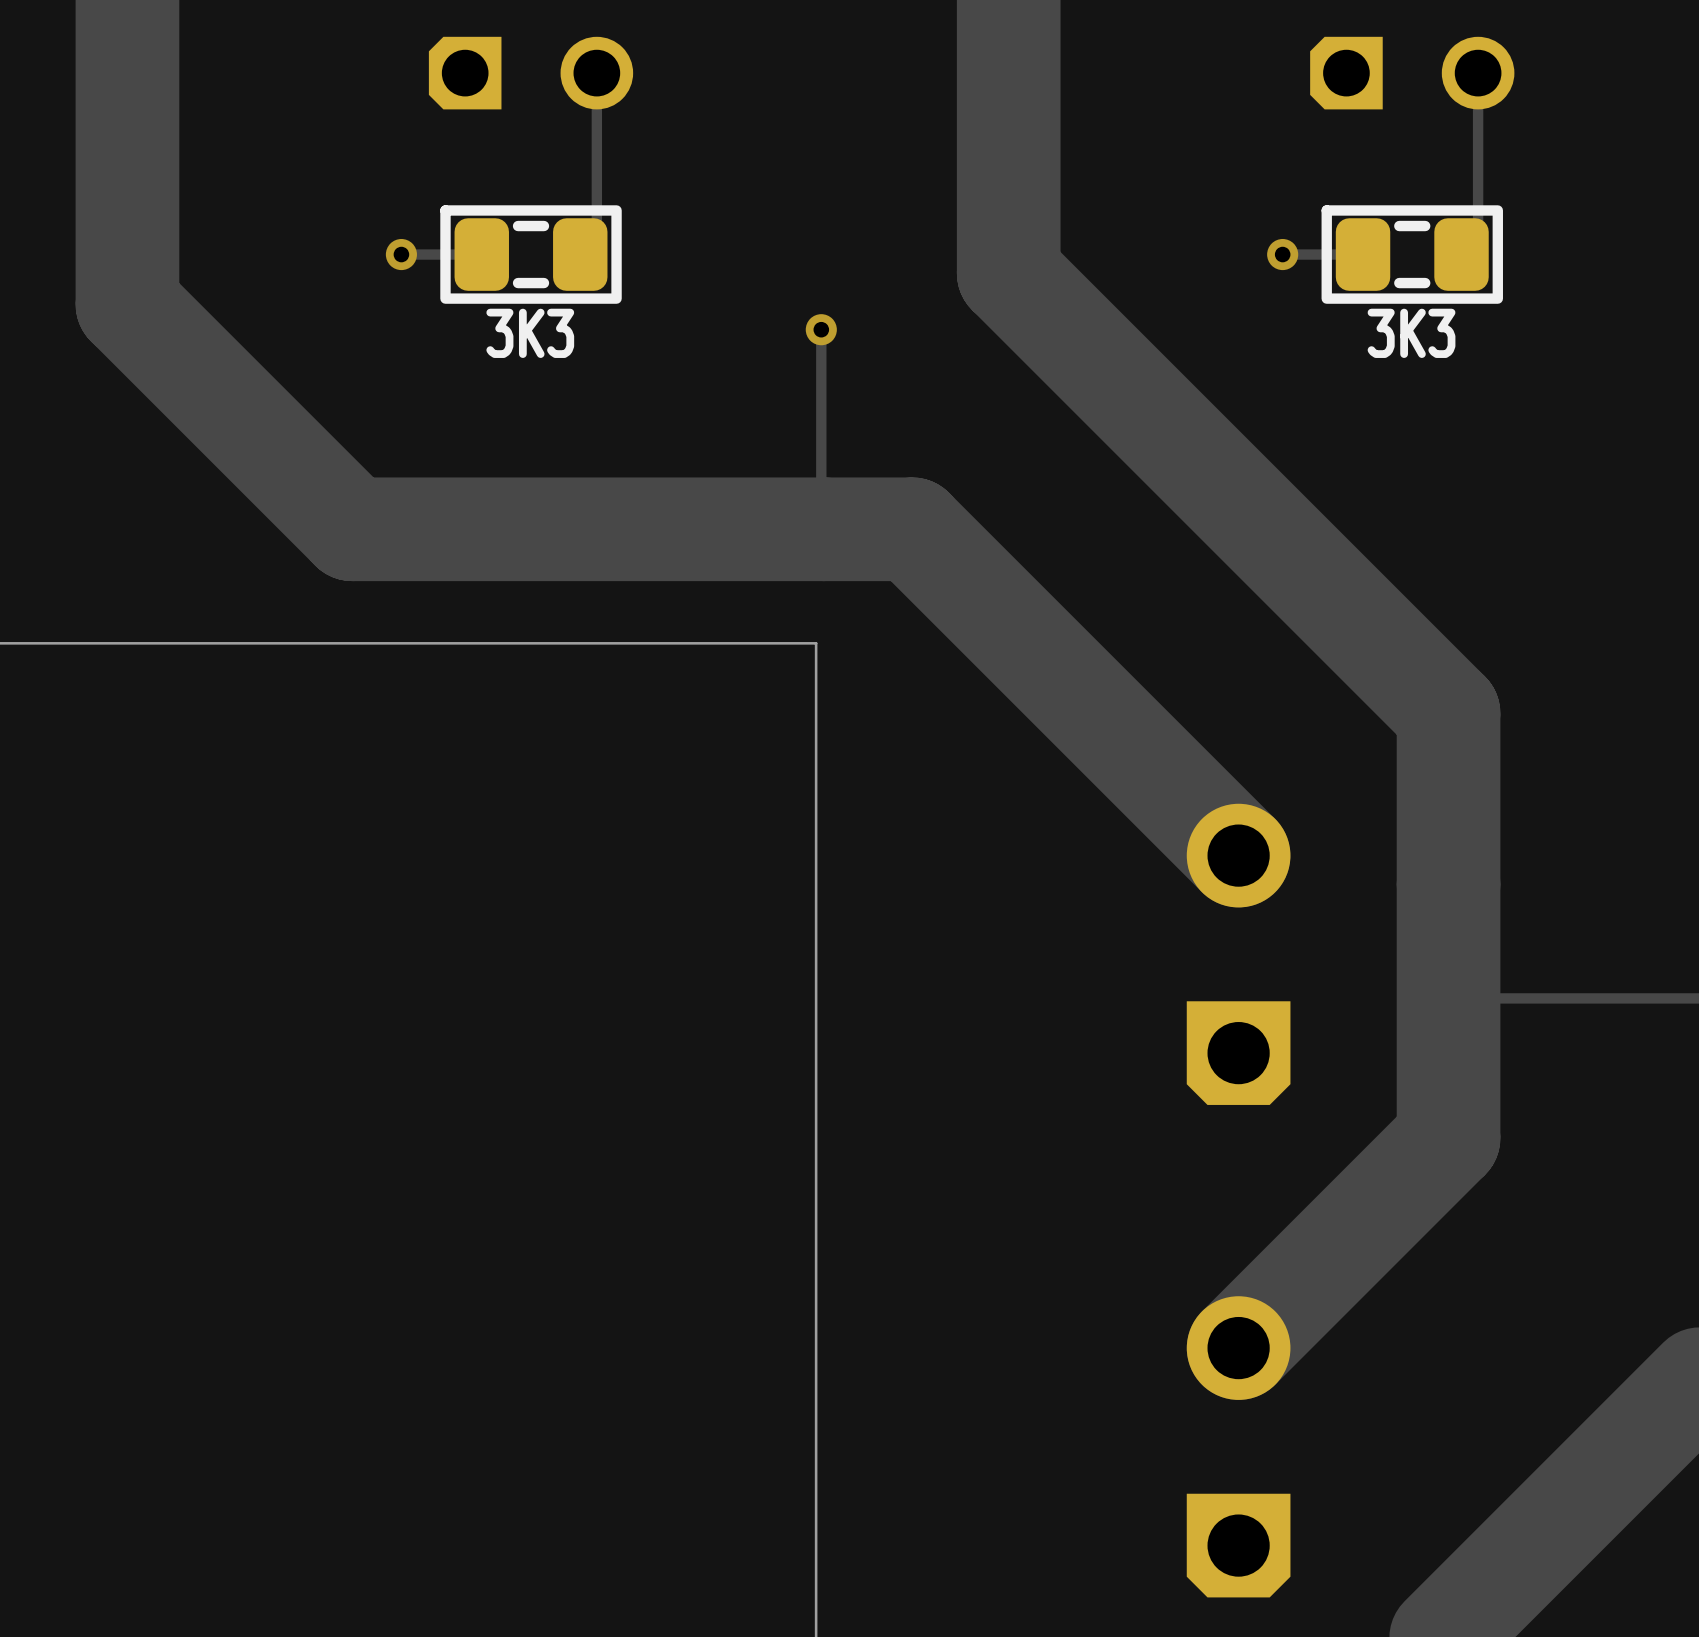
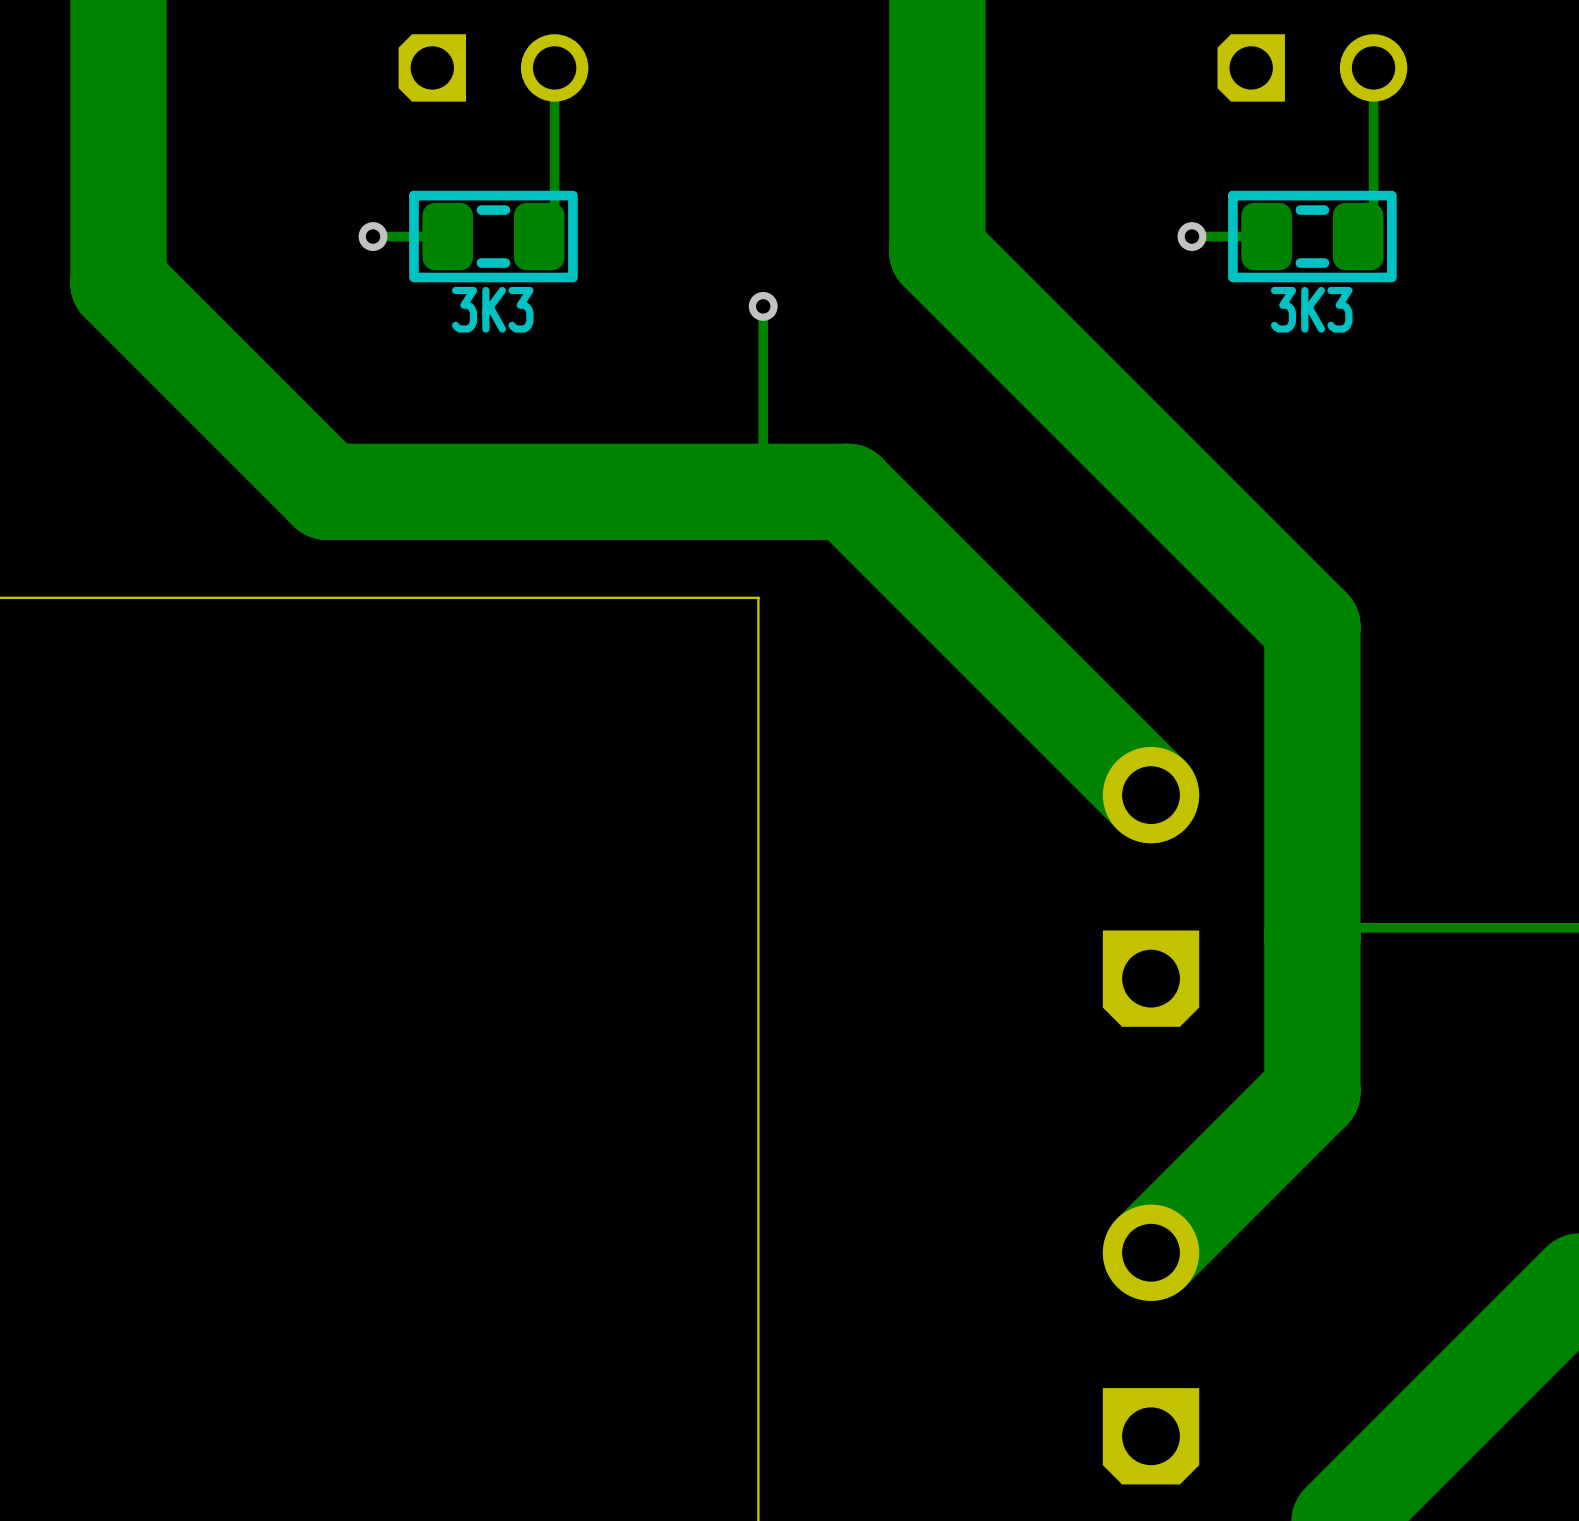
track: (1008, 270) (1008, 273) (1448, 713) (1448, 1138) (1412, 1174) -> (937, 251) (1312, 626) (1312, 1091)

